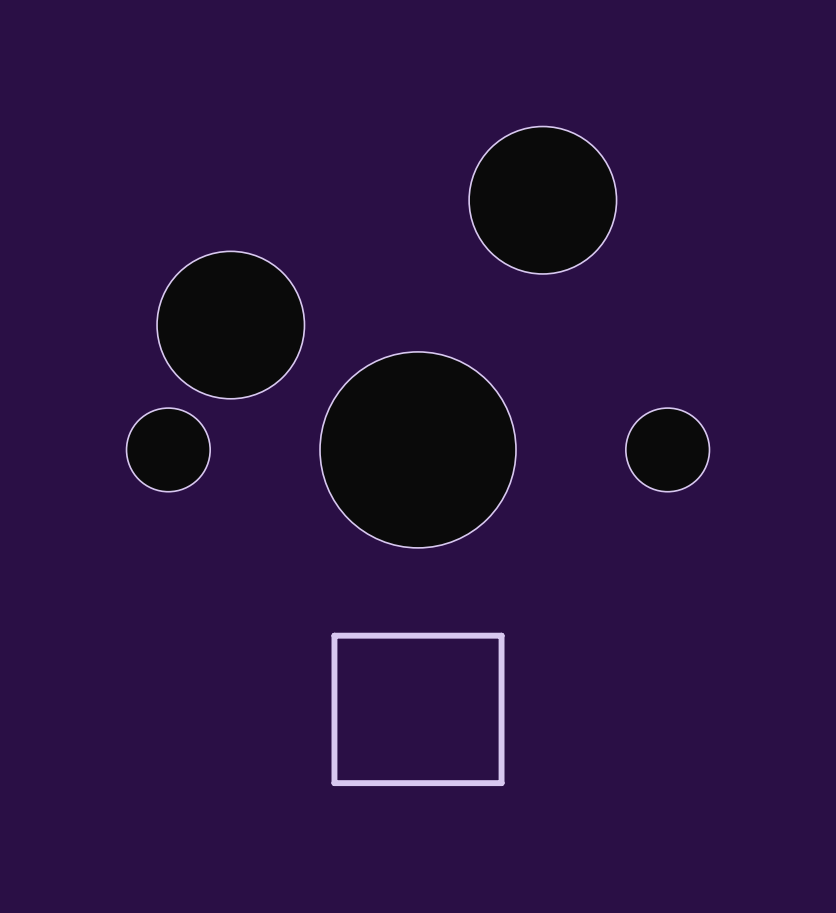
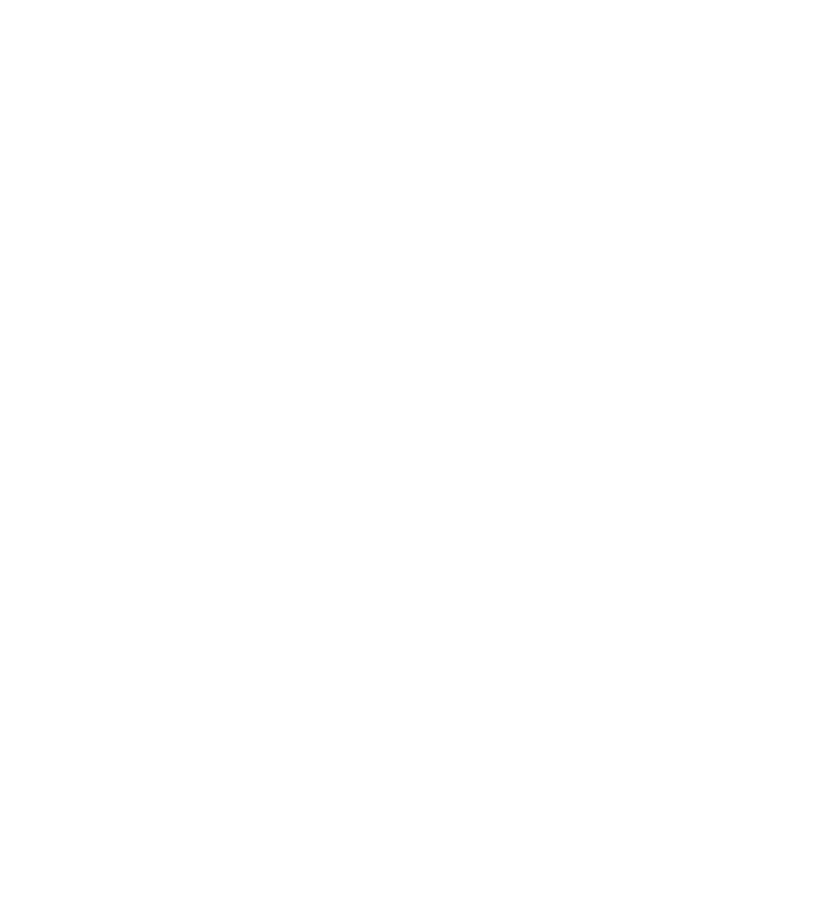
part: (418, 456) -> none

